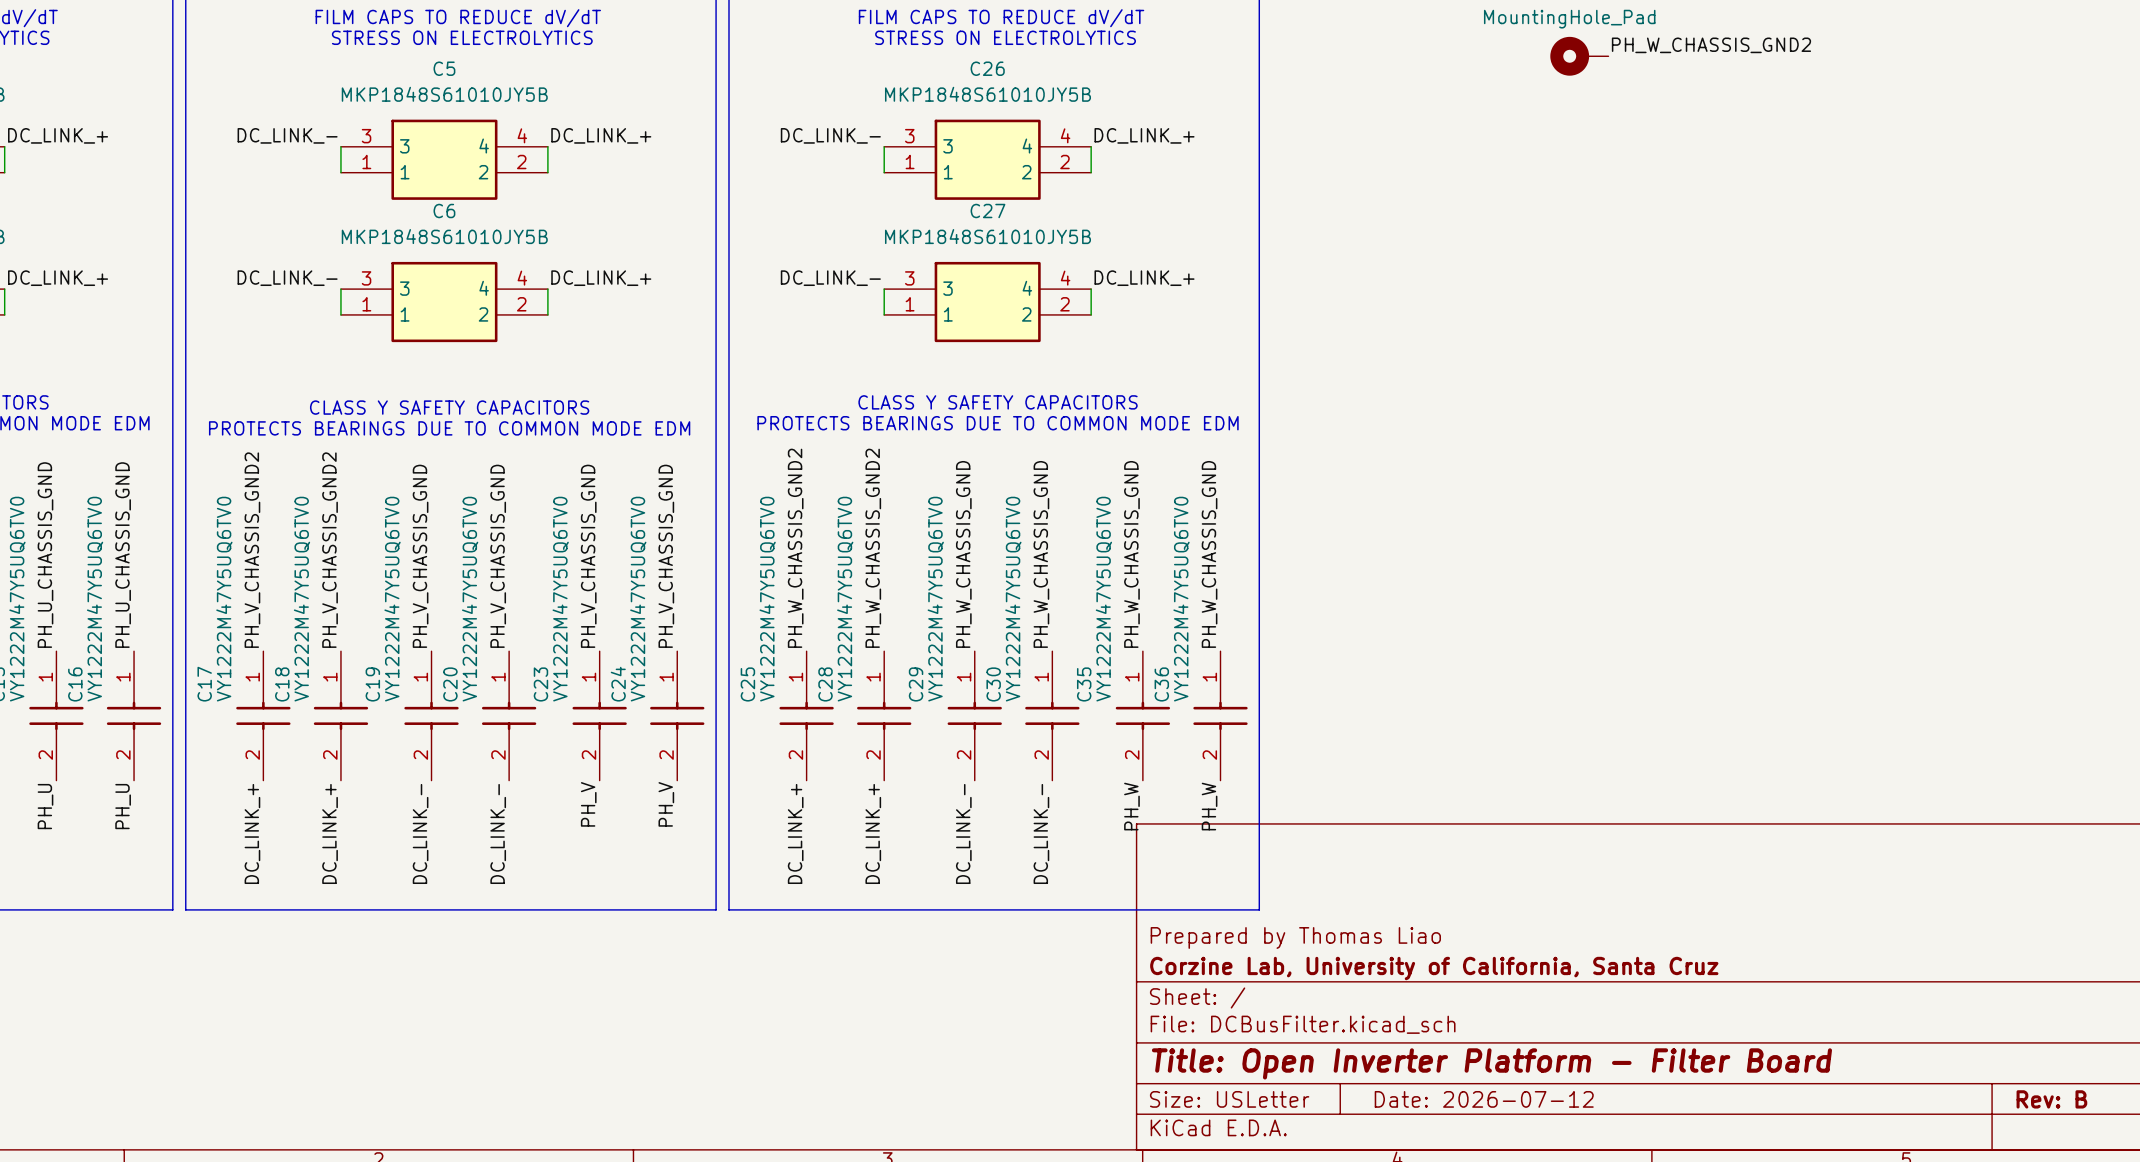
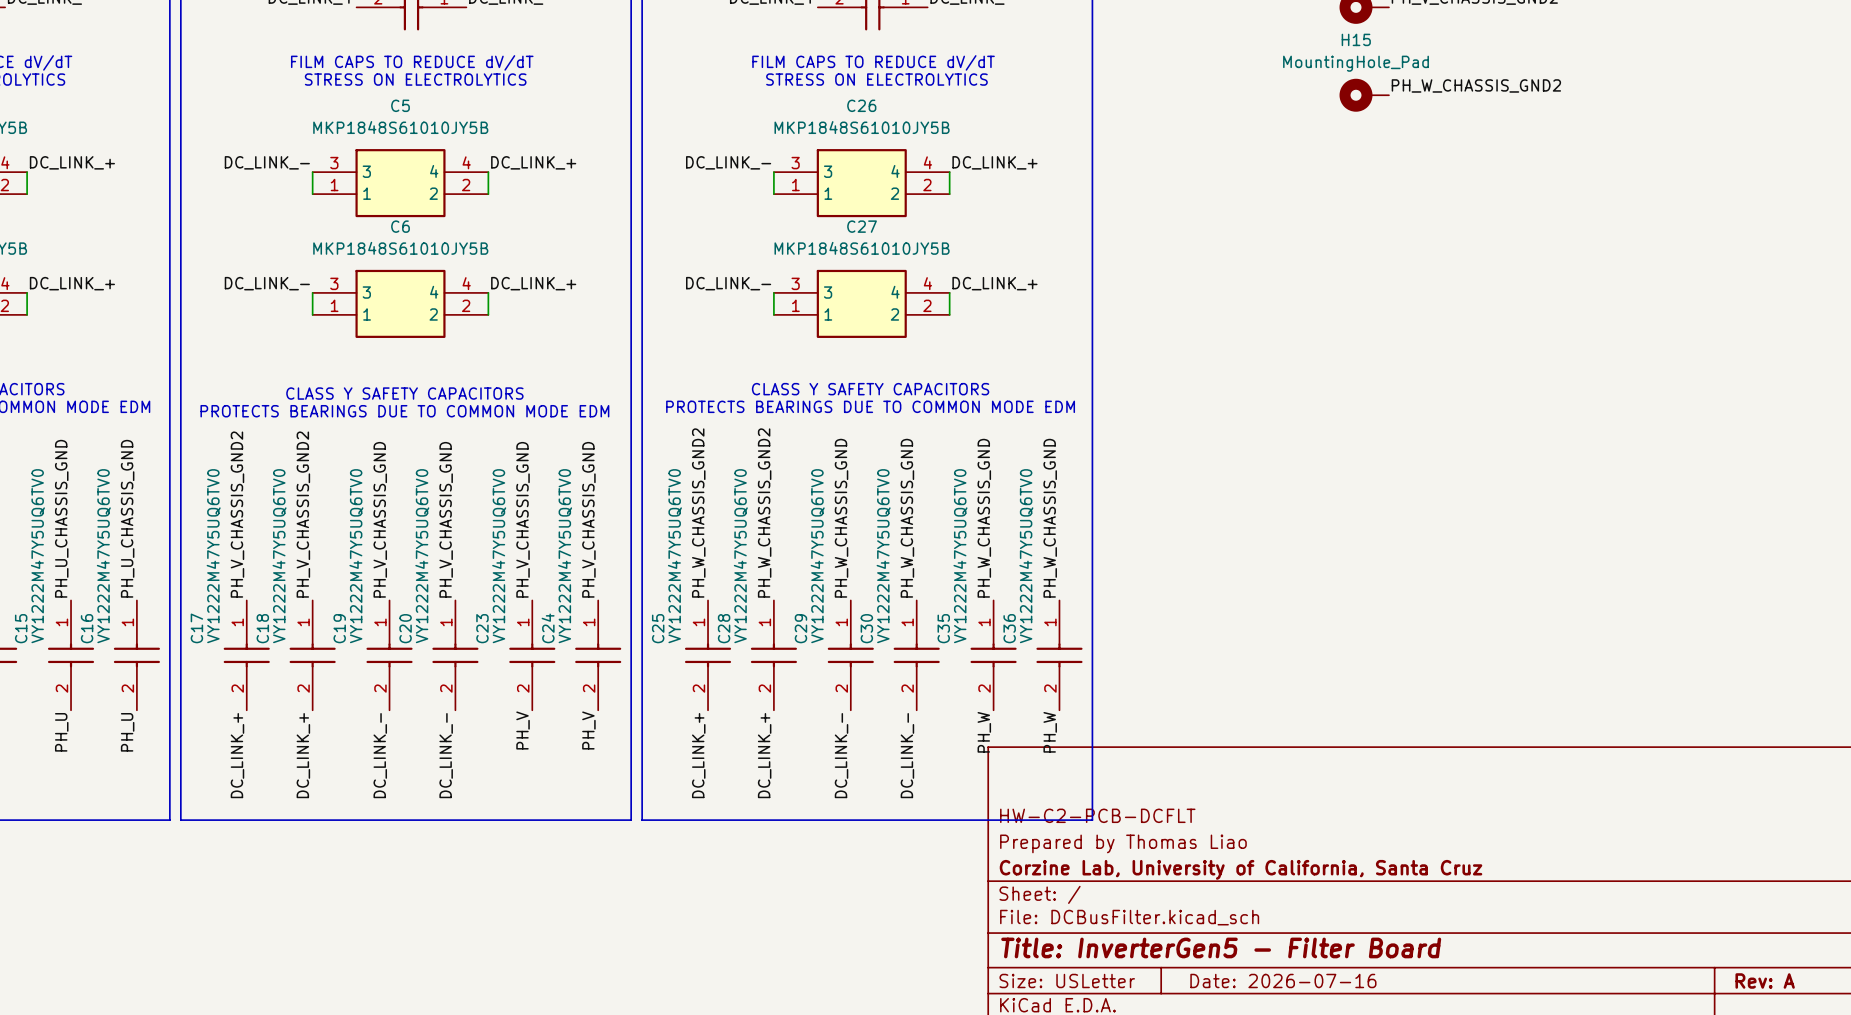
title block: none -> HW-C2-PCB-DCFLT (1097, 815)
title block: Title: Open Inverter Platform - Filter Board (1491, 1063) -> Title: InverterGen5 - Filter Board (1221, 947)
title block: Date: 2026-07-12 (1484, 1099) -> Date: 2026-07-16 (1283, 980)
title block: Rev: B (2051, 1099) -> Rev: A (1765, 980)

